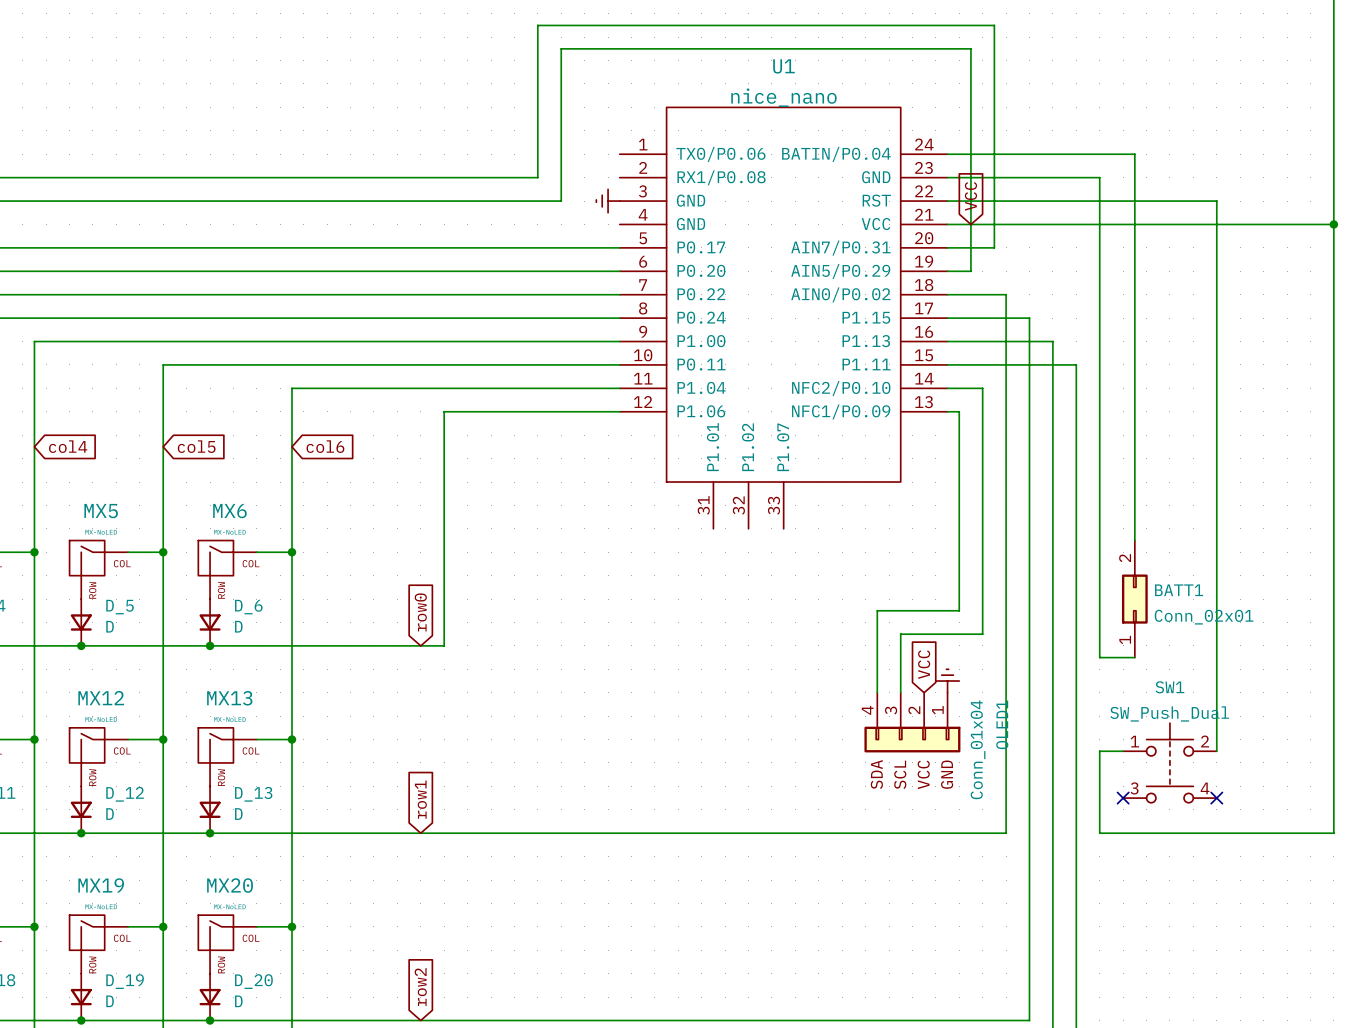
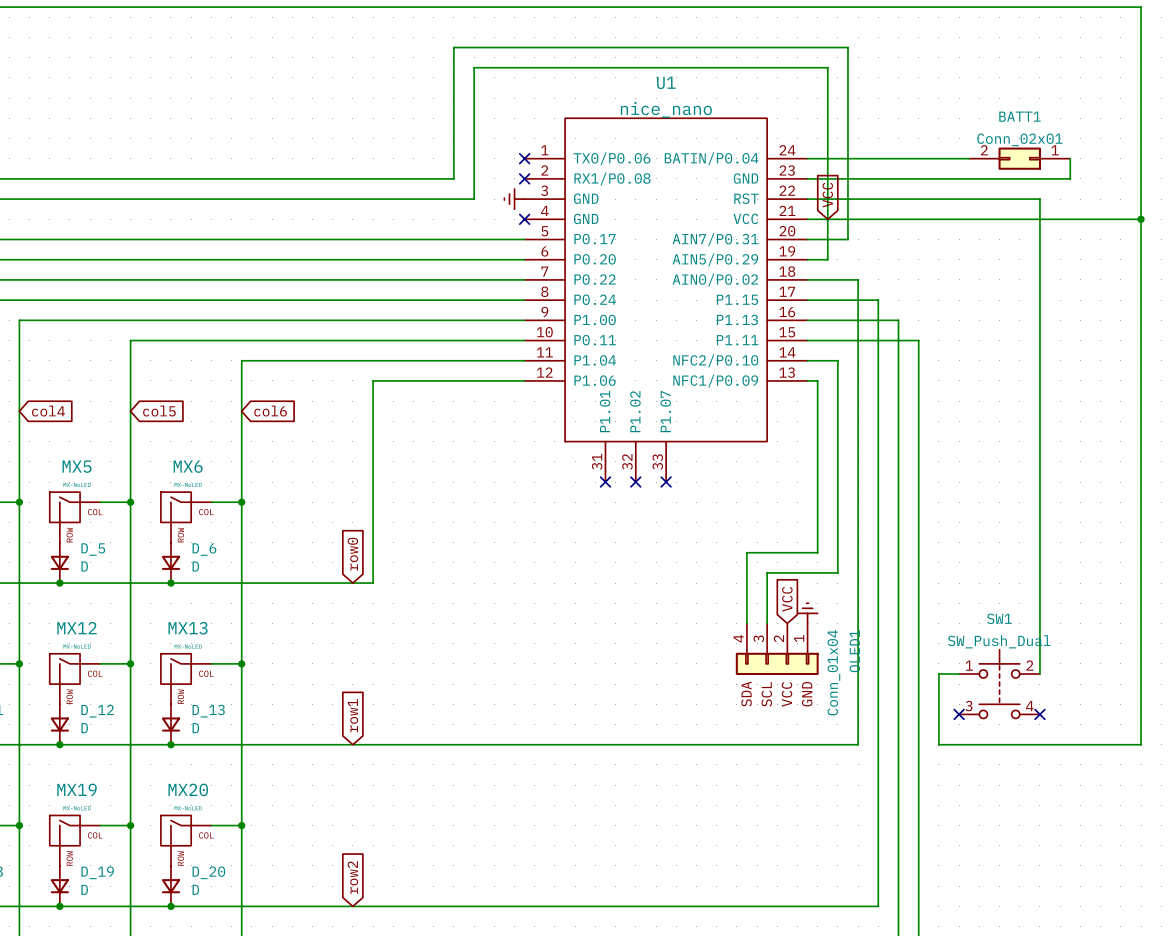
no-connect mark: none -> (524, 158)
wire: (1134, 154) (1134, 540) -> none
no-connect mark: none -> (524, 178)
wire: (1099, 177) (1099, 657) (1134, 657) -> (938, 178) (1070, 178) (1070, 158)
no-connect mark: none -> (524, 219)
no-connect mark: none -> (605, 482)
no-connect mark: none -> (635, 482)
no-connect mark: none -> (666, 482)
BATT1 rotation: 0° (1134, 599) -> 90° counterclockwise (1019, 158)
BATT1 position: (1134, 599) -> (1019, 158)
BATT1 value position: Conn_02x01 (1204, 617) -> Conn_02x01 (1019, 139)

